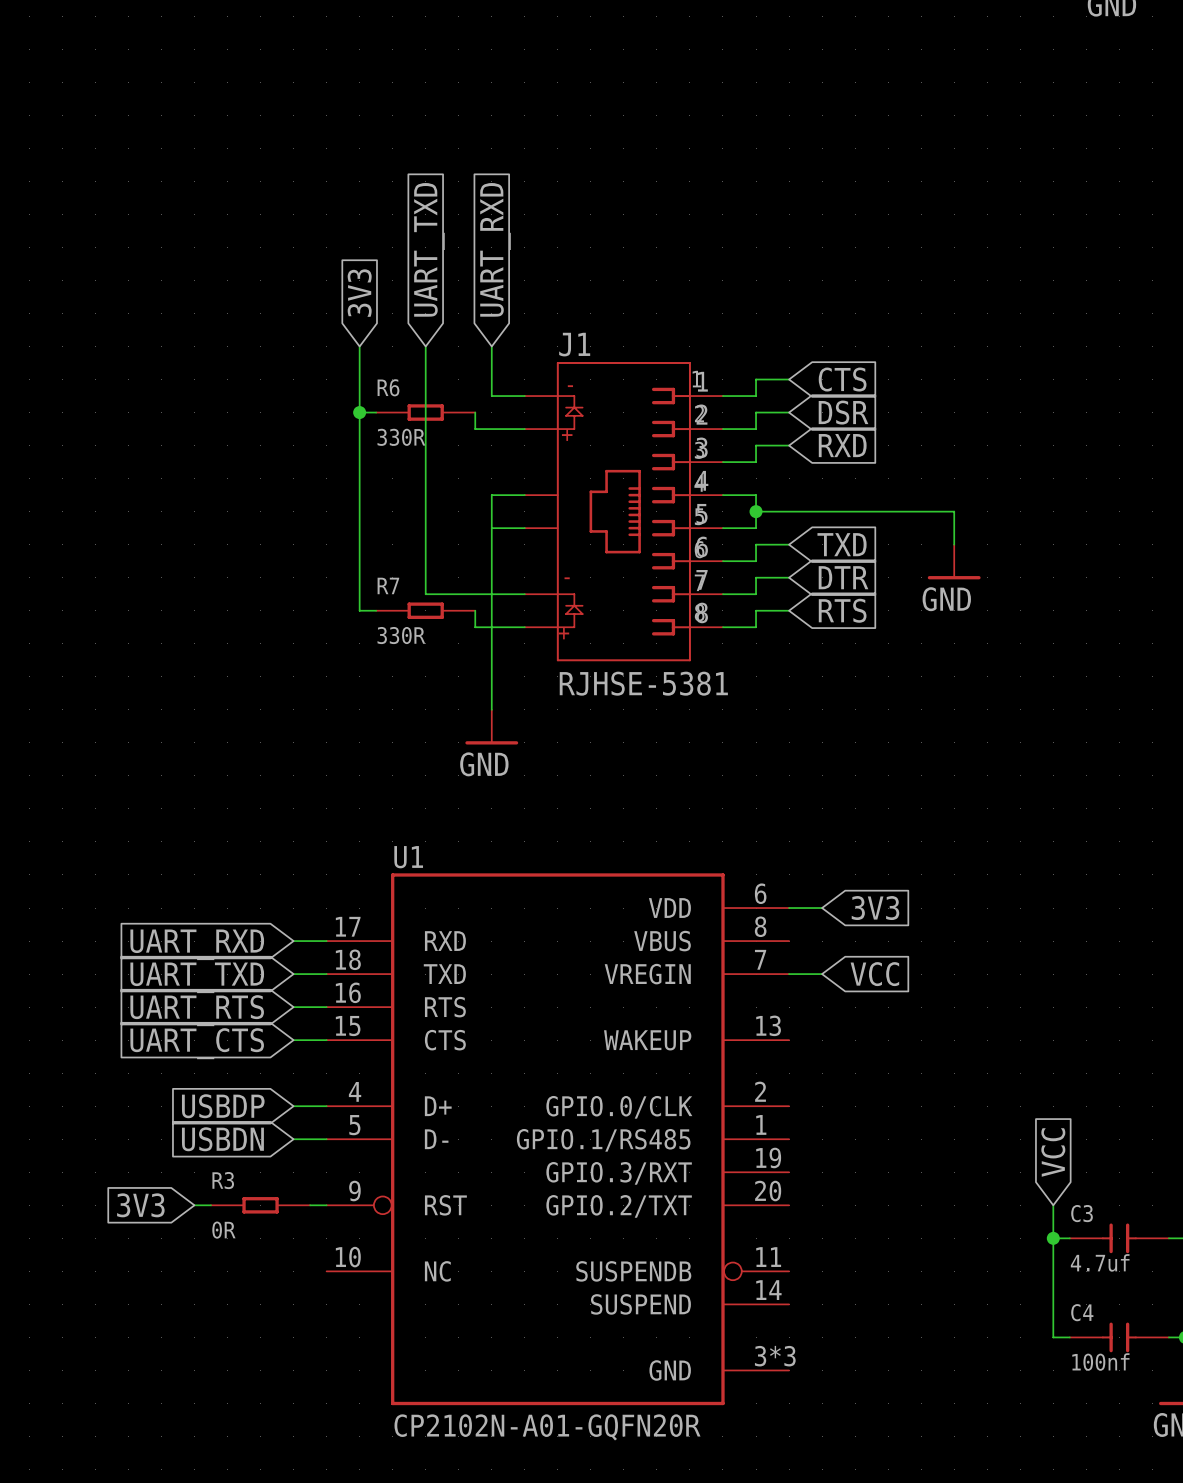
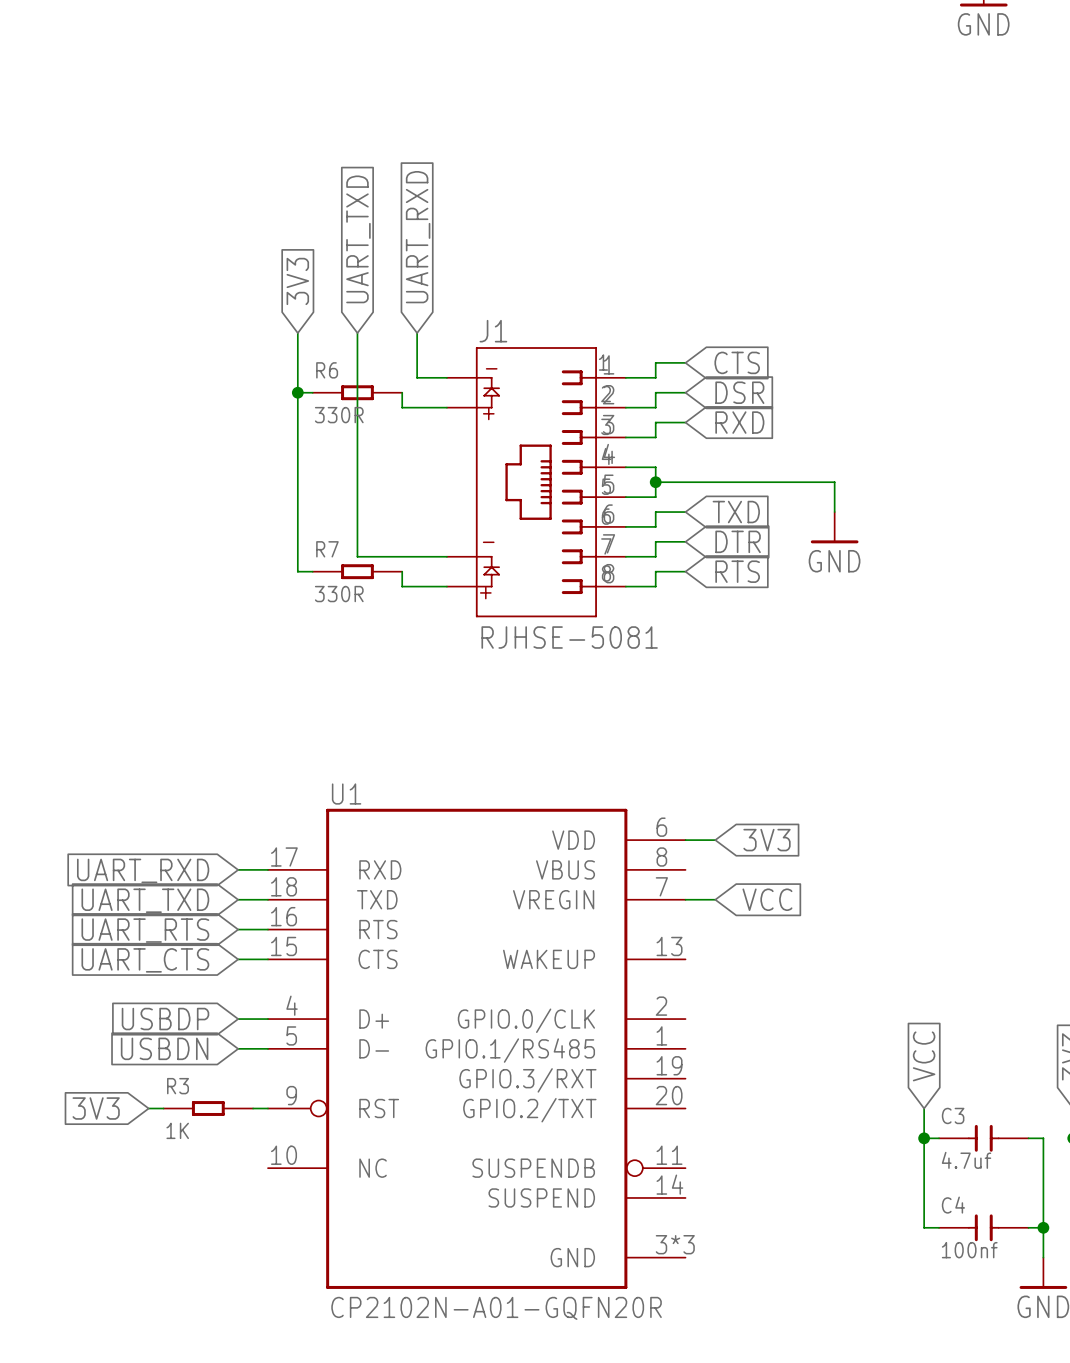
J1 symbol: [524, 362, 723, 662] -> [446, 347, 626, 618]
wire: (524, 495) (491, 495) (491, 709) -> none
wire: (491, 528) (524, 528) -> none
J1 value: RJHSE-5381 (643, 683) -> RJHSE-5081 (569, 637)
power symbol: GND (491, 727) -> none
R3 value: 0R (223, 1230) -> 1K (177, 1130)

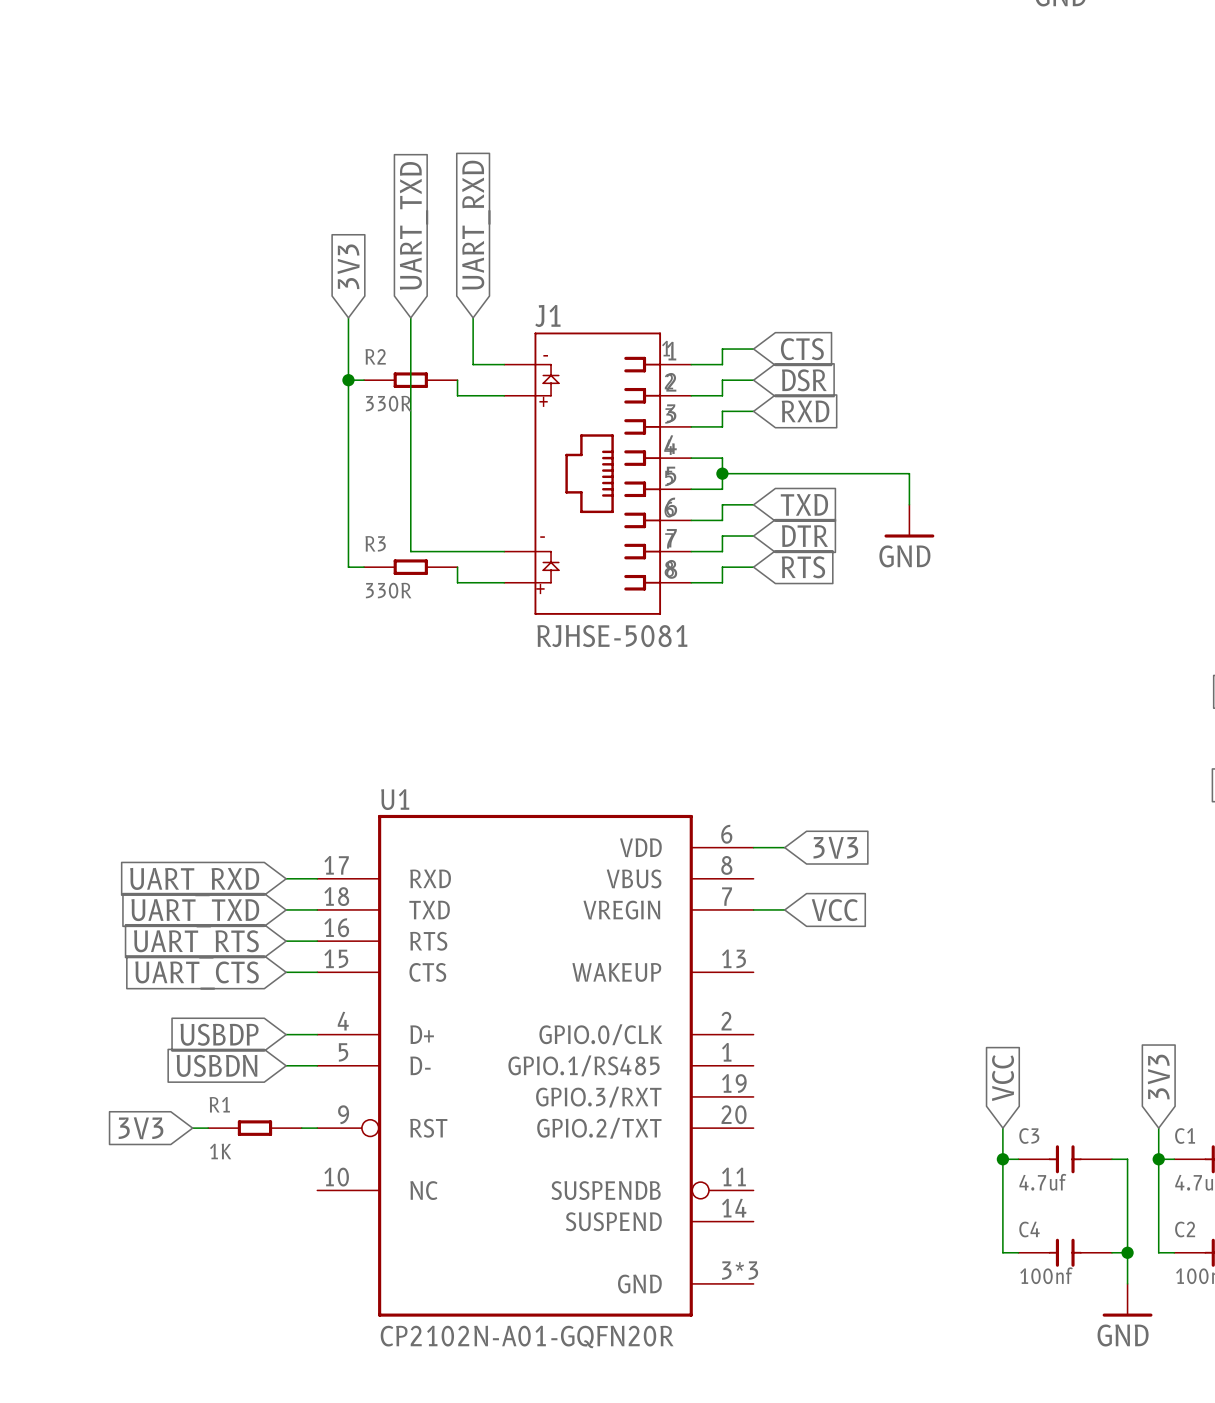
R6 name: R6 (327, 370) -> R2 (375, 356)
R7 name: R7 (327, 549) -> R3 (375, 543)
R3 name: R3 (178, 1086) -> R1 (219, 1104)

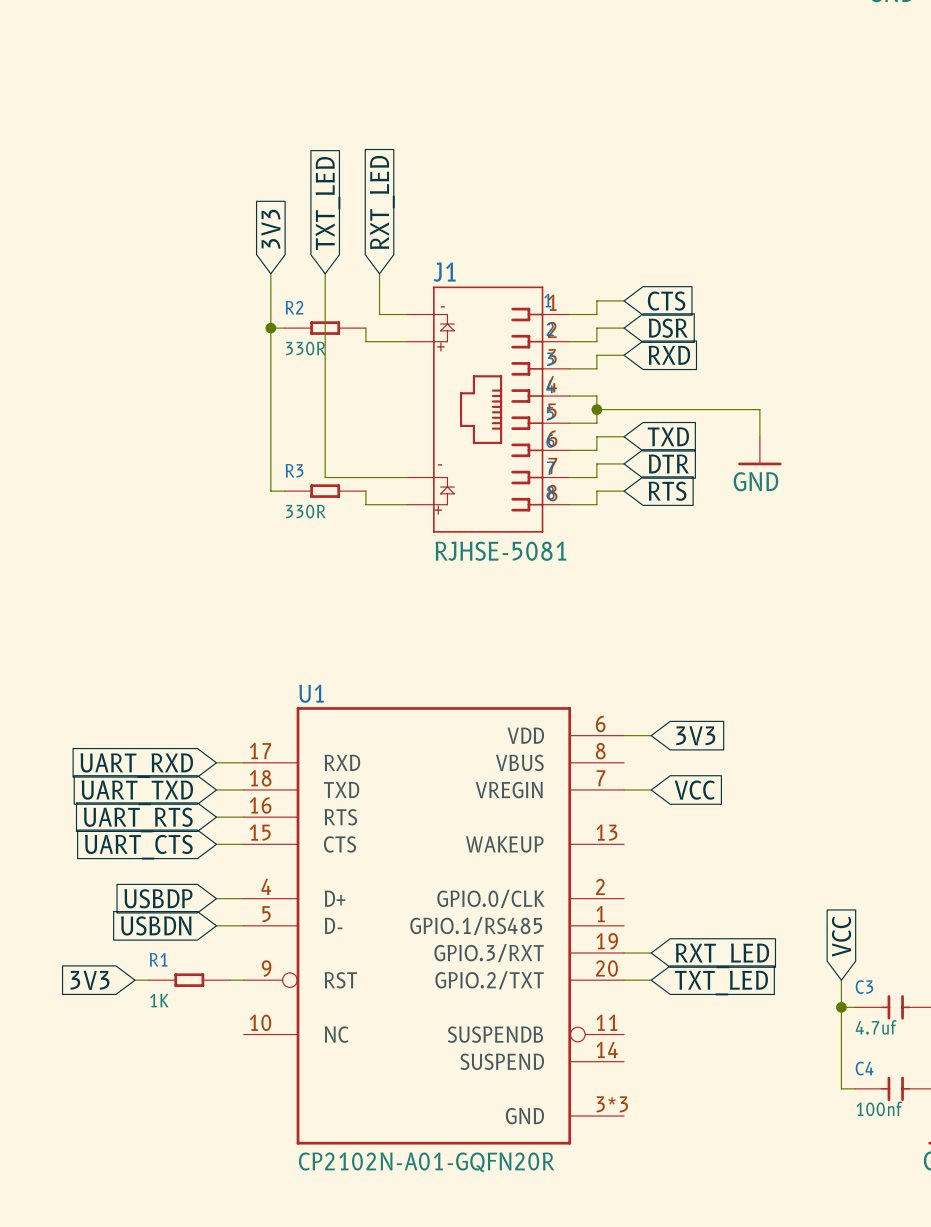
global label: UART_TXD (414, 225) -> TXT_LED (328, 203)
global label: UART_RXD (476, 225) -> RXT_LED (382, 202)
wire: none -> (624, 953) (651, 953)
global label: none -> RXT_LED (722, 955)
wire: none -> (624, 980) (651, 980)
global label: none -> TXT_LED (721, 983)

